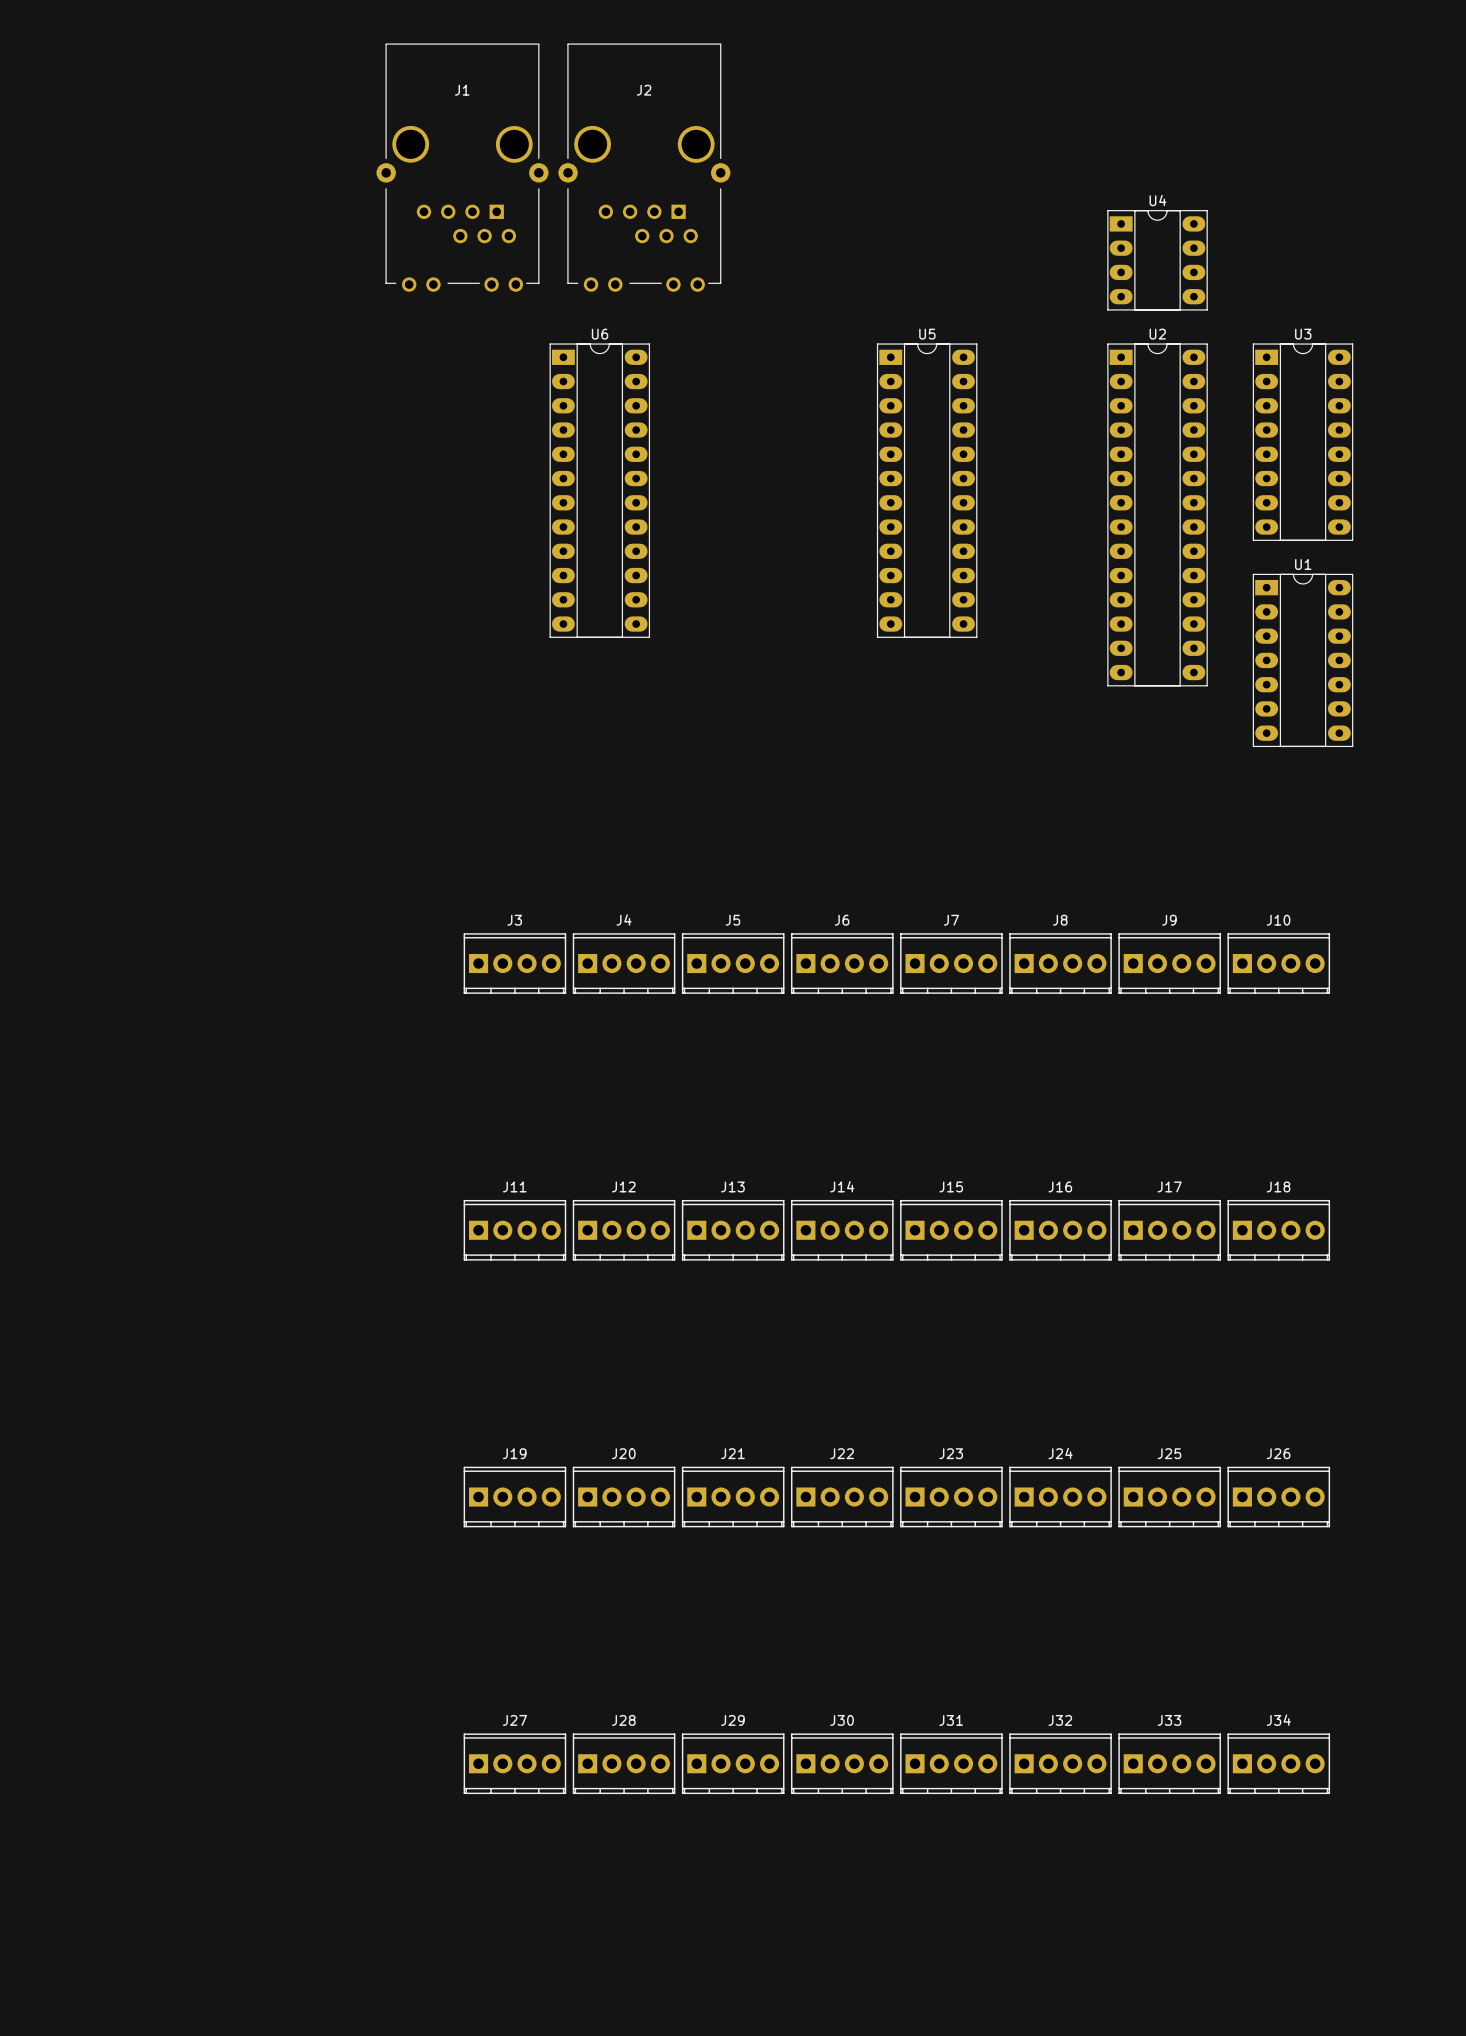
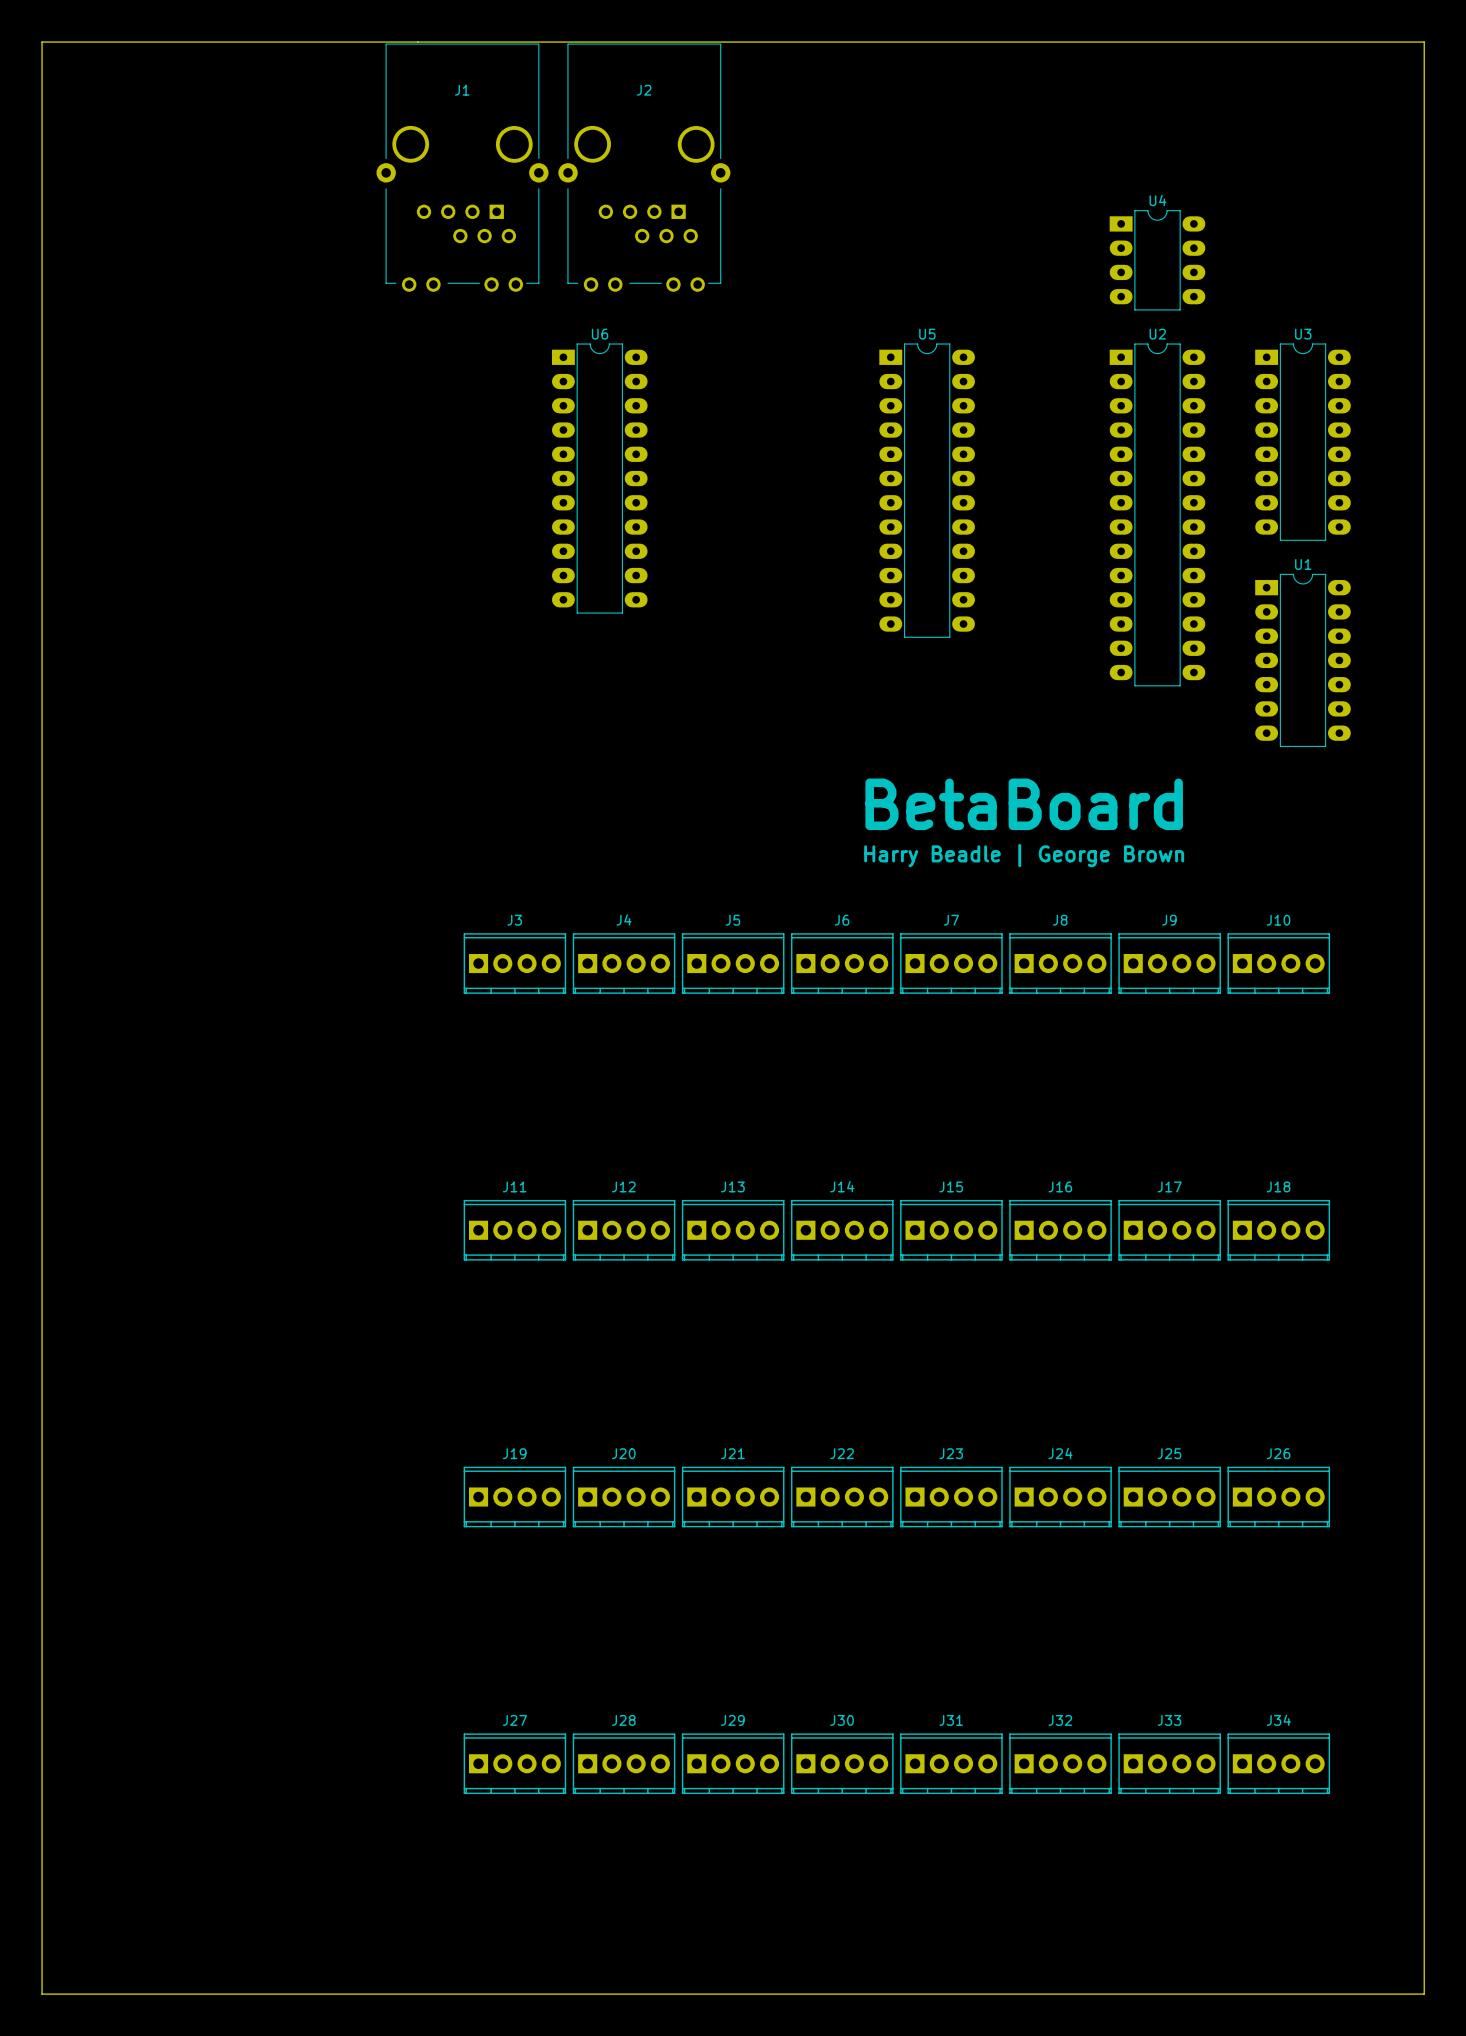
board edge: none -> (42, 42) (1424, 42) (1424, 1994) (42, 1994) (42, 42)
U4 footprint: [1107, 210, 1208, 311] -> [1109, 210, 1206, 311]
U6 footprint: [549, 343, 651, 638] -> [551, 343, 648, 614]
U5 footprint: [876, 343, 978, 638] -> [879, 343, 975, 638]
U2 footprint: [1107, 343, 1208, 687] -> [1109, 343, 1206, 687]
U3 footprint: [1252, 343, 1354, 541] -> [1255, 343, 1351, 541]
U1 footprint: [1252, 573, 1354, 748] -> [1255, 573, 1351, 748]
text: none -> BetaBoard (1024, 804)
text: none -> Harry Beadle | George Brown (1024, 855)

